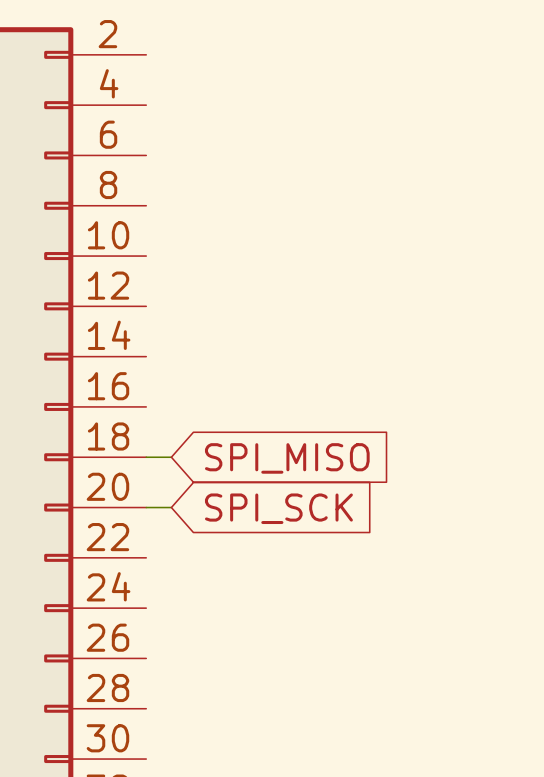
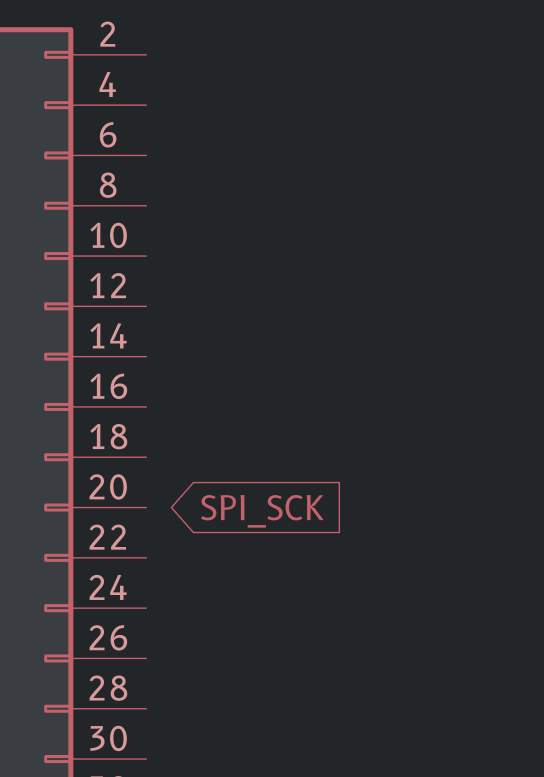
wire: (146, 457) (171, 457) -> none
global label: SPI_MISO (287, 458) -> none
wire: (146, 507) (171, 507) -> none

